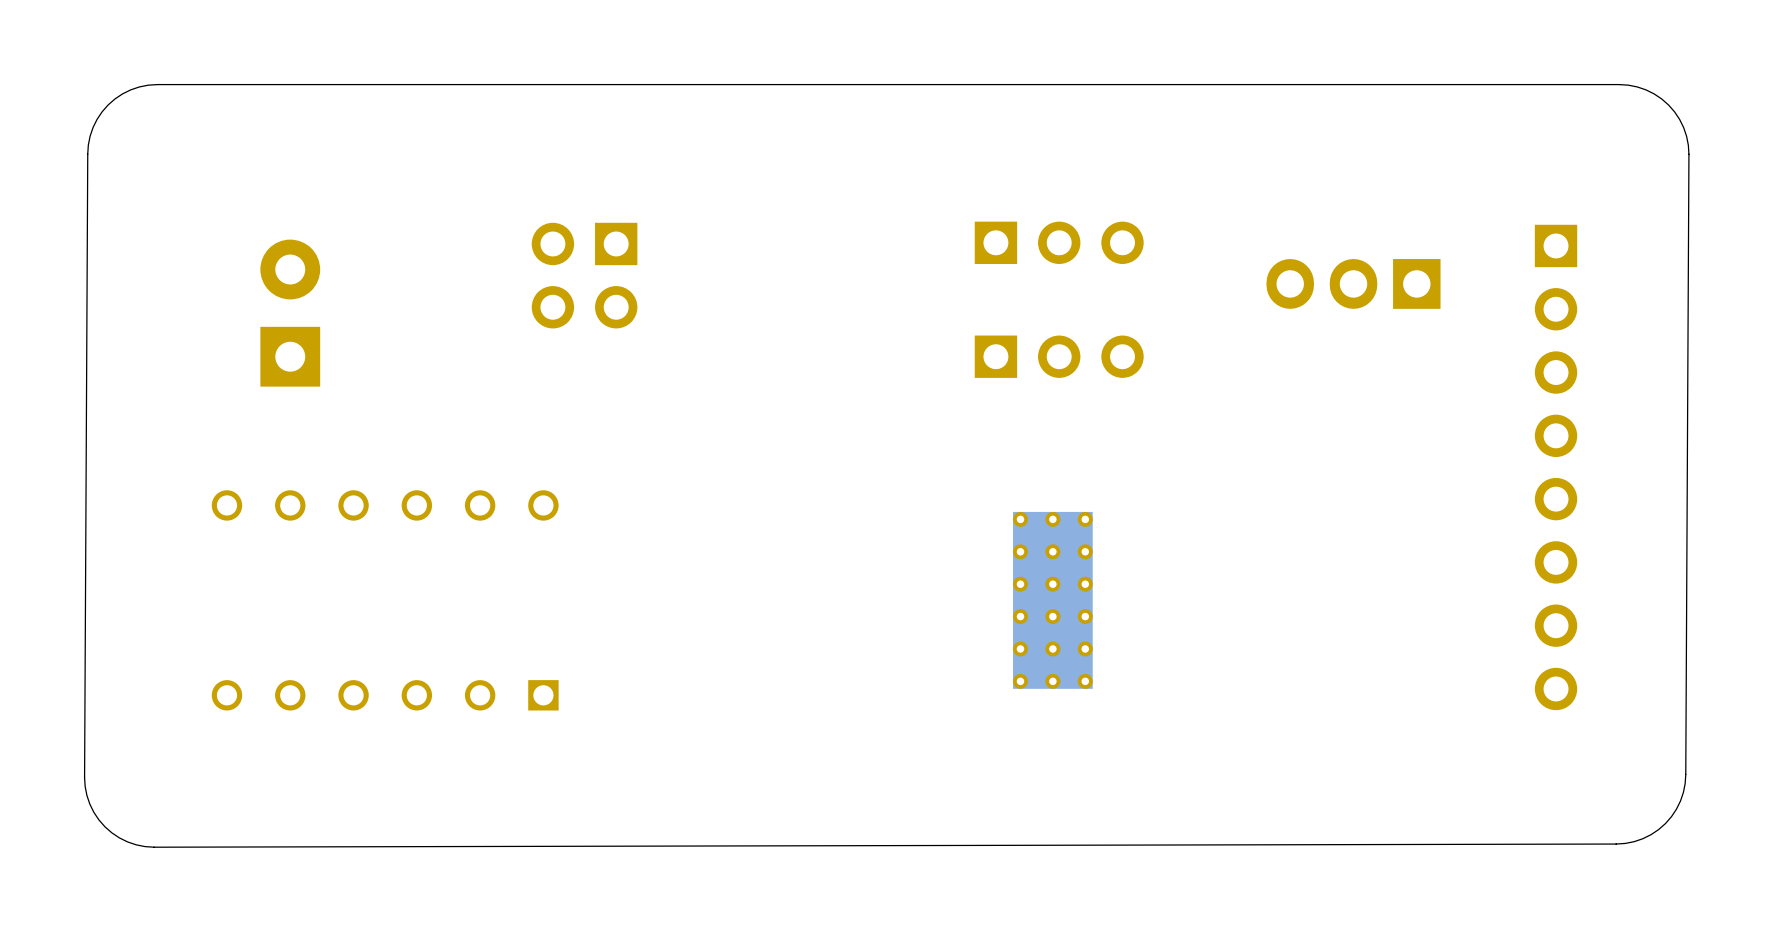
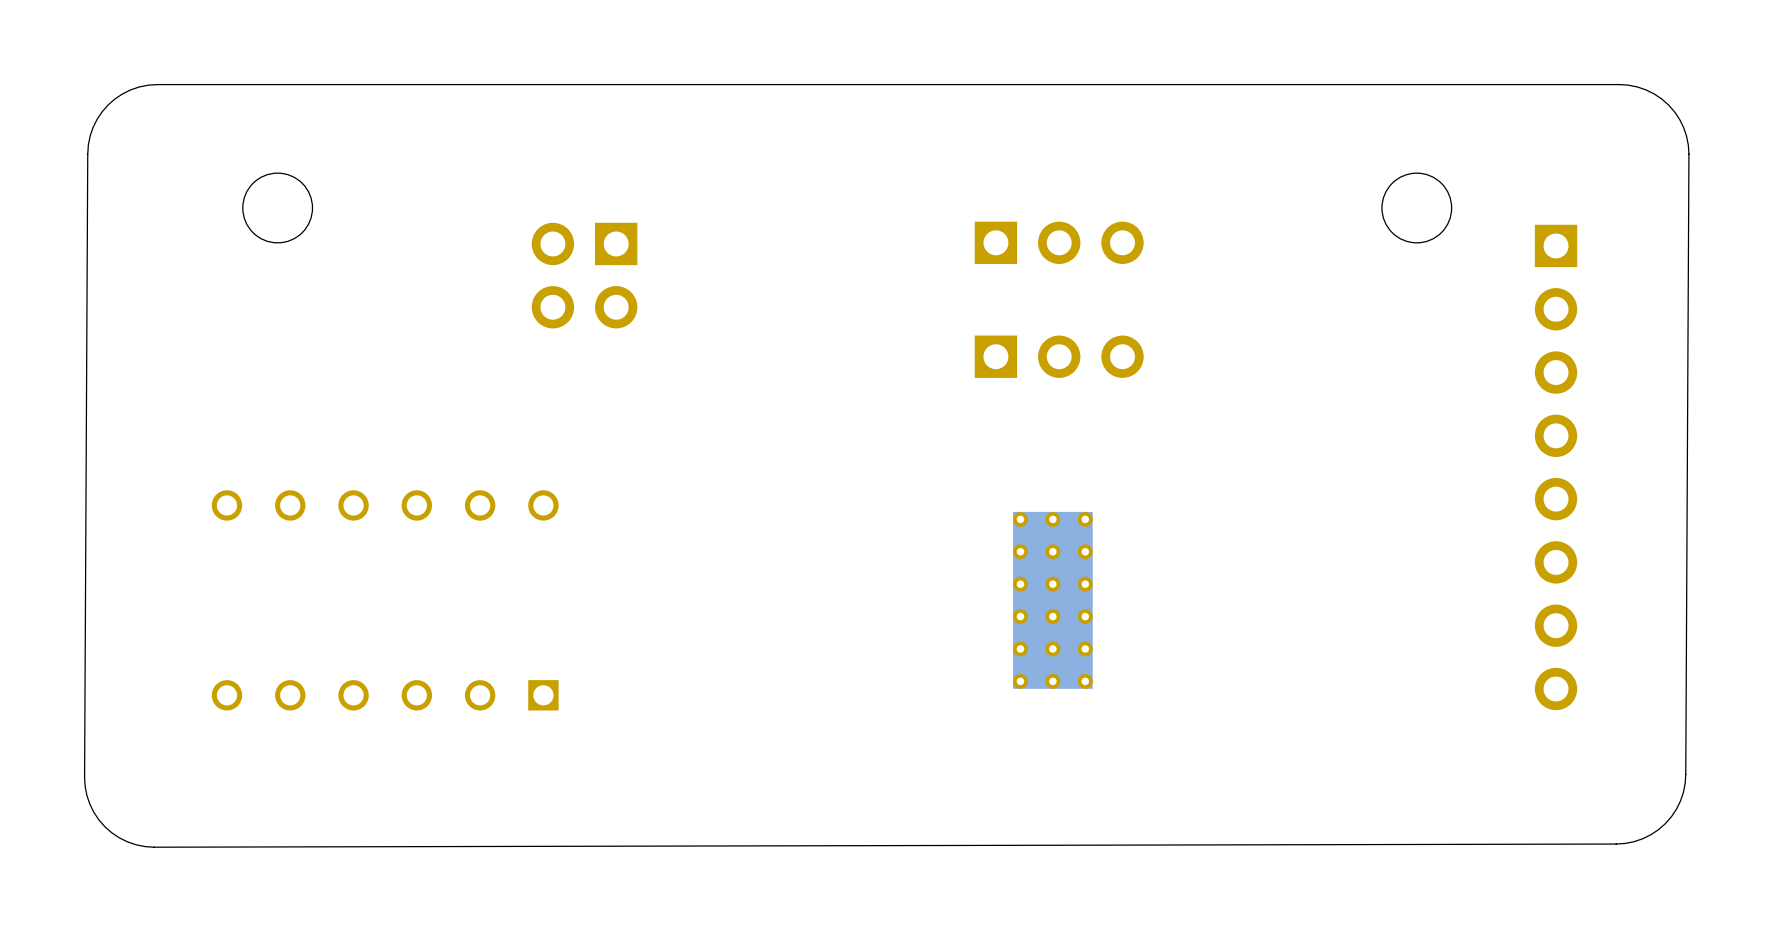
round board edge: none -> [242, 172, 314, 244]
round board edge: none -> [1381, 172, 1453, 244]
part: (1353, 283) -> none
part: (290, 313) -> none

